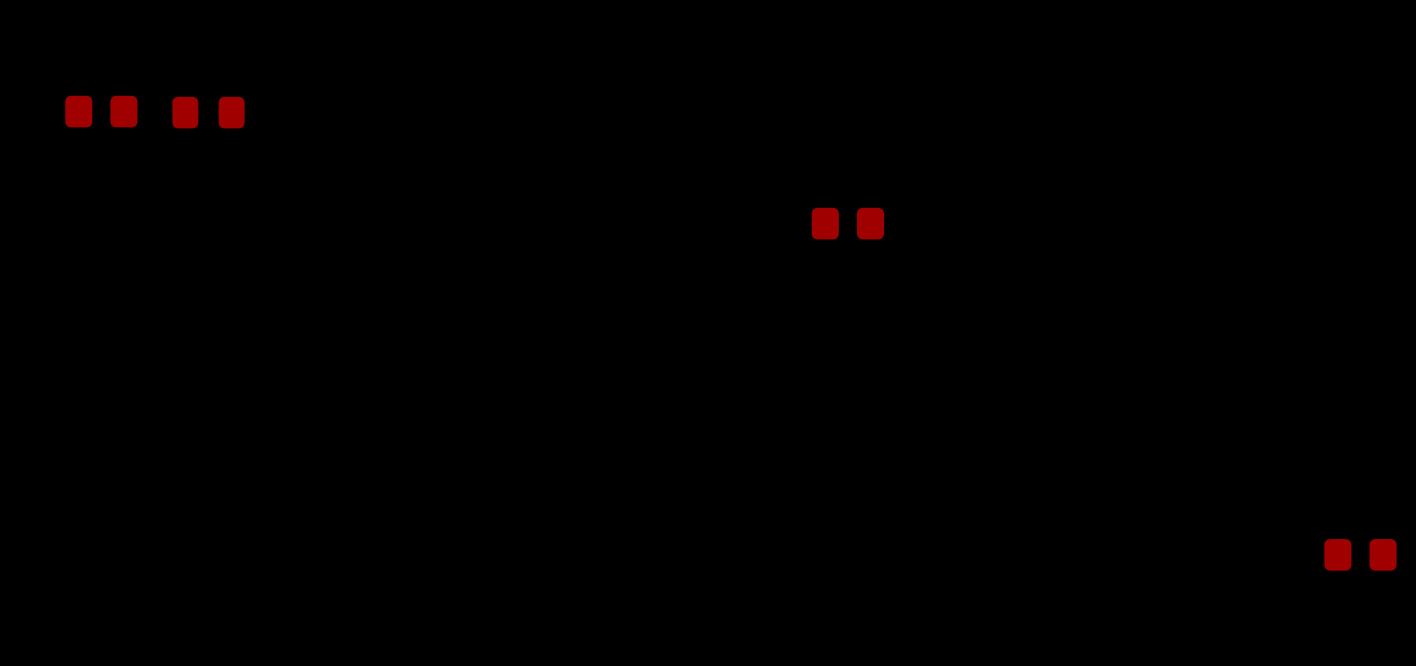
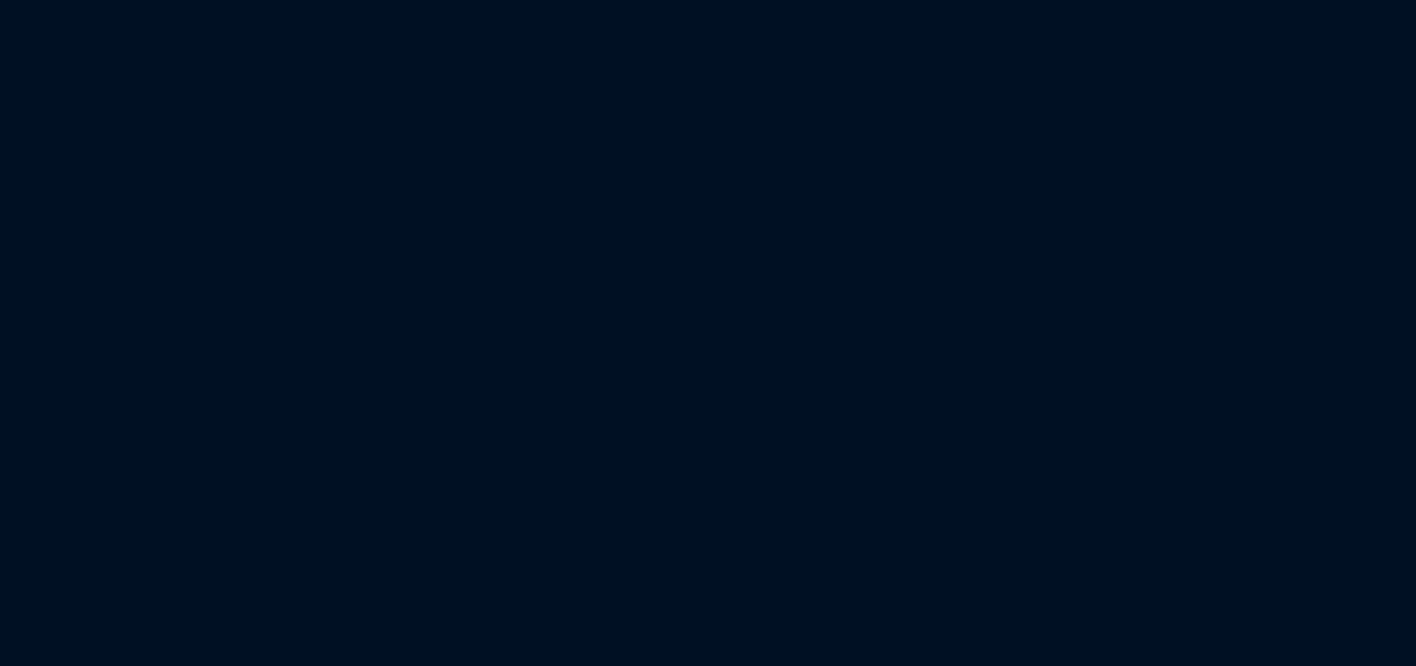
part: (101, 111) -> none
part: (208, 112) -> none
part: (847, 223) -> none
part: (1360, 554) -> none

